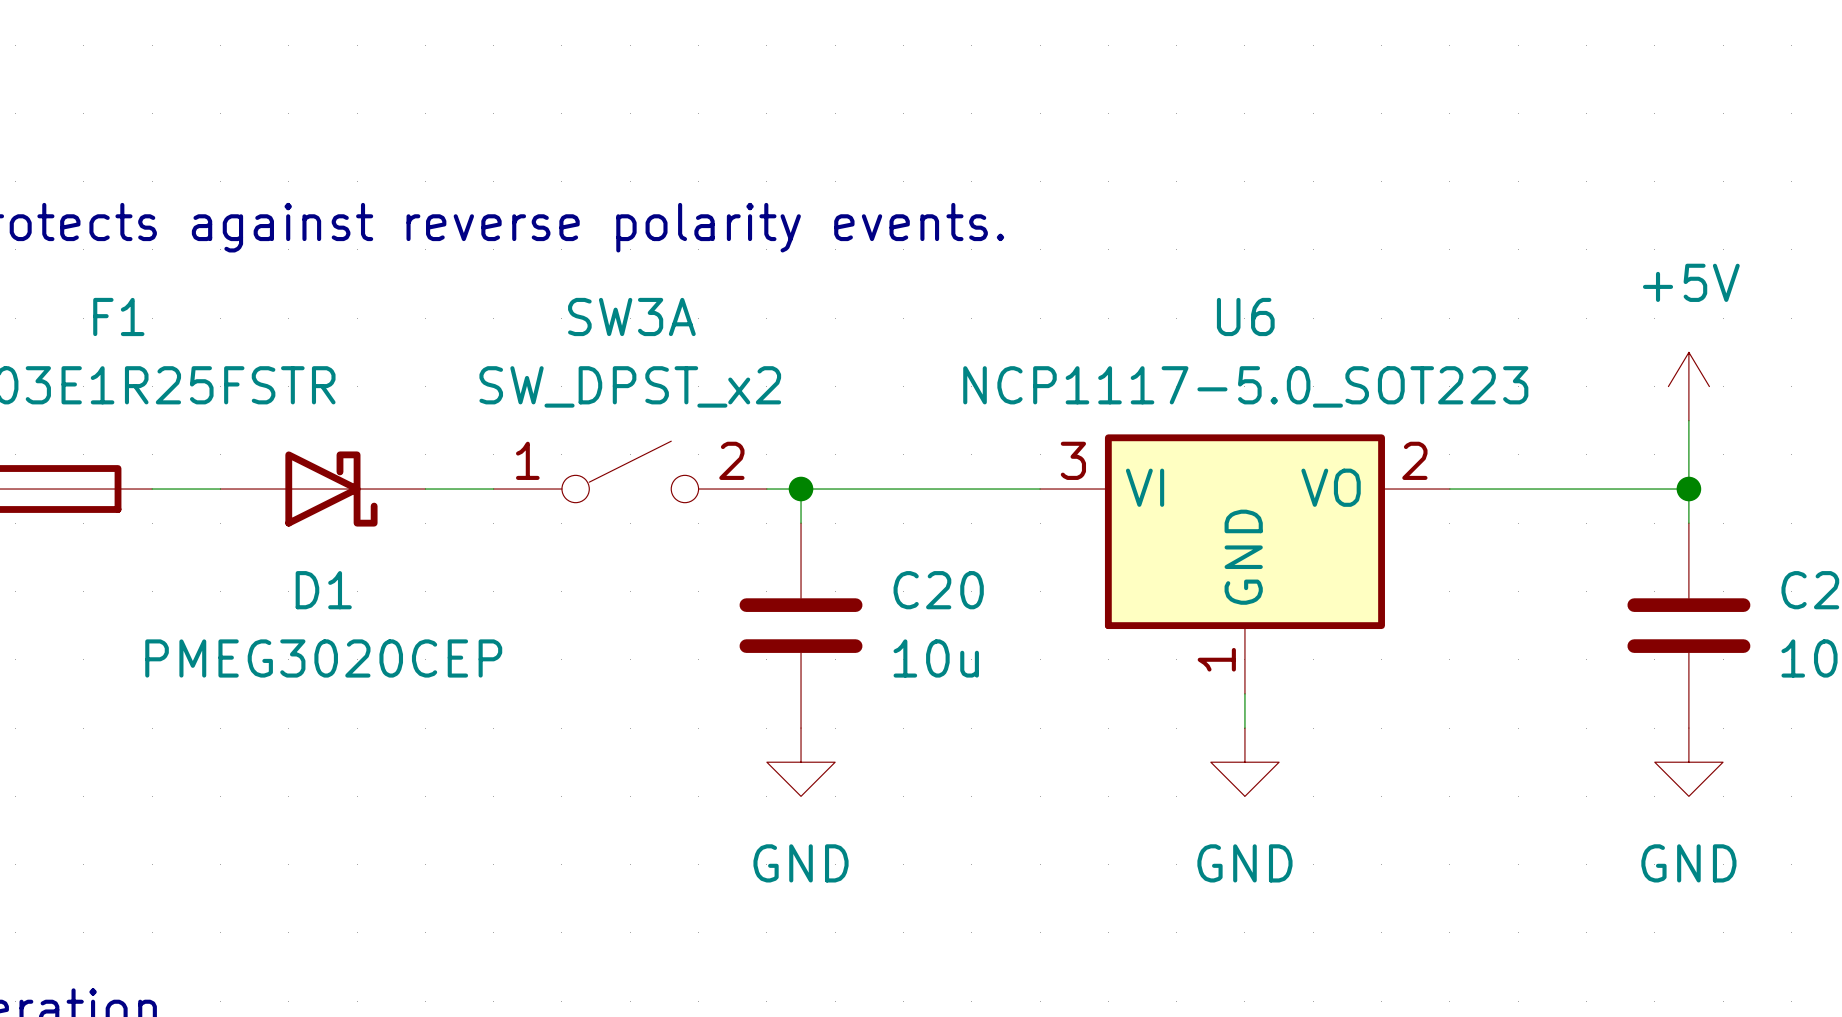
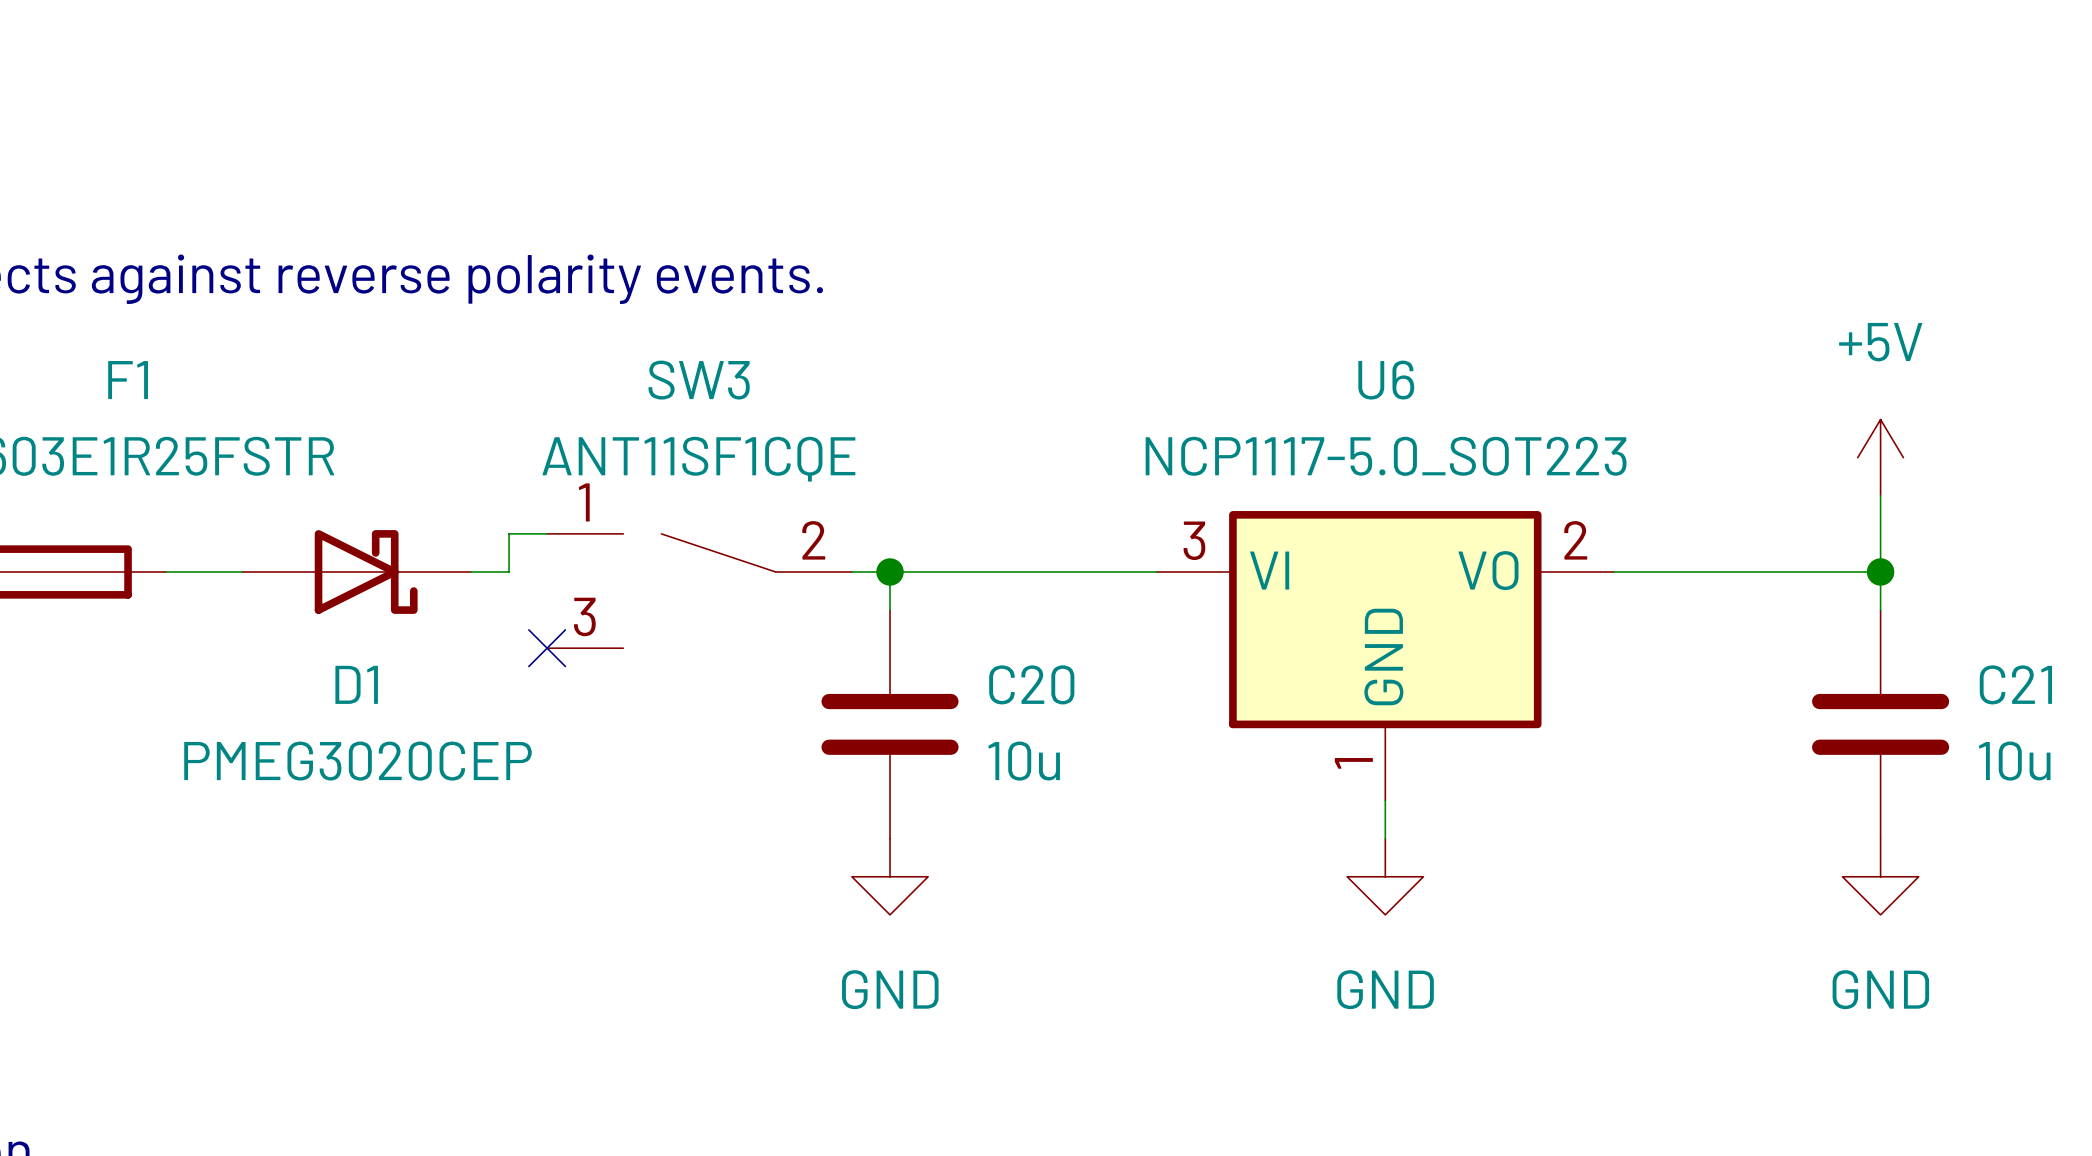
SW3A: SW_DPST_x2 (630, 471) -> none
wire: (459, 489) (493, 489) -> (509, 571) (509, 533) (547, 533)
SW3: none -> ANT11SF1CQE (699, 591)
no-connect mark: none -> (547, 648)

